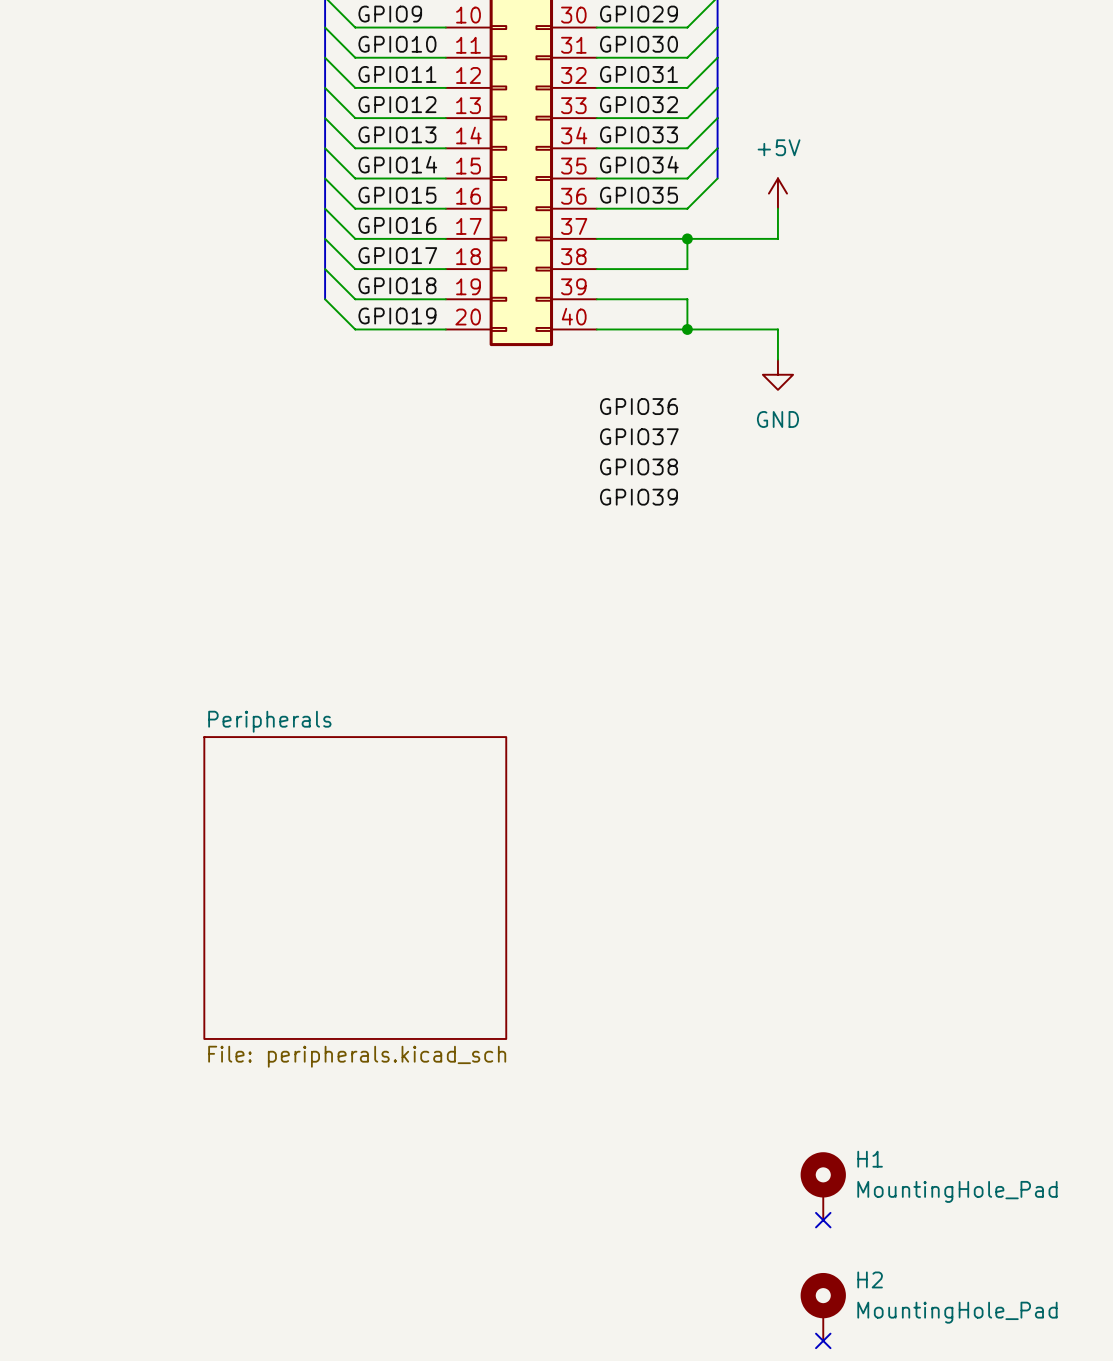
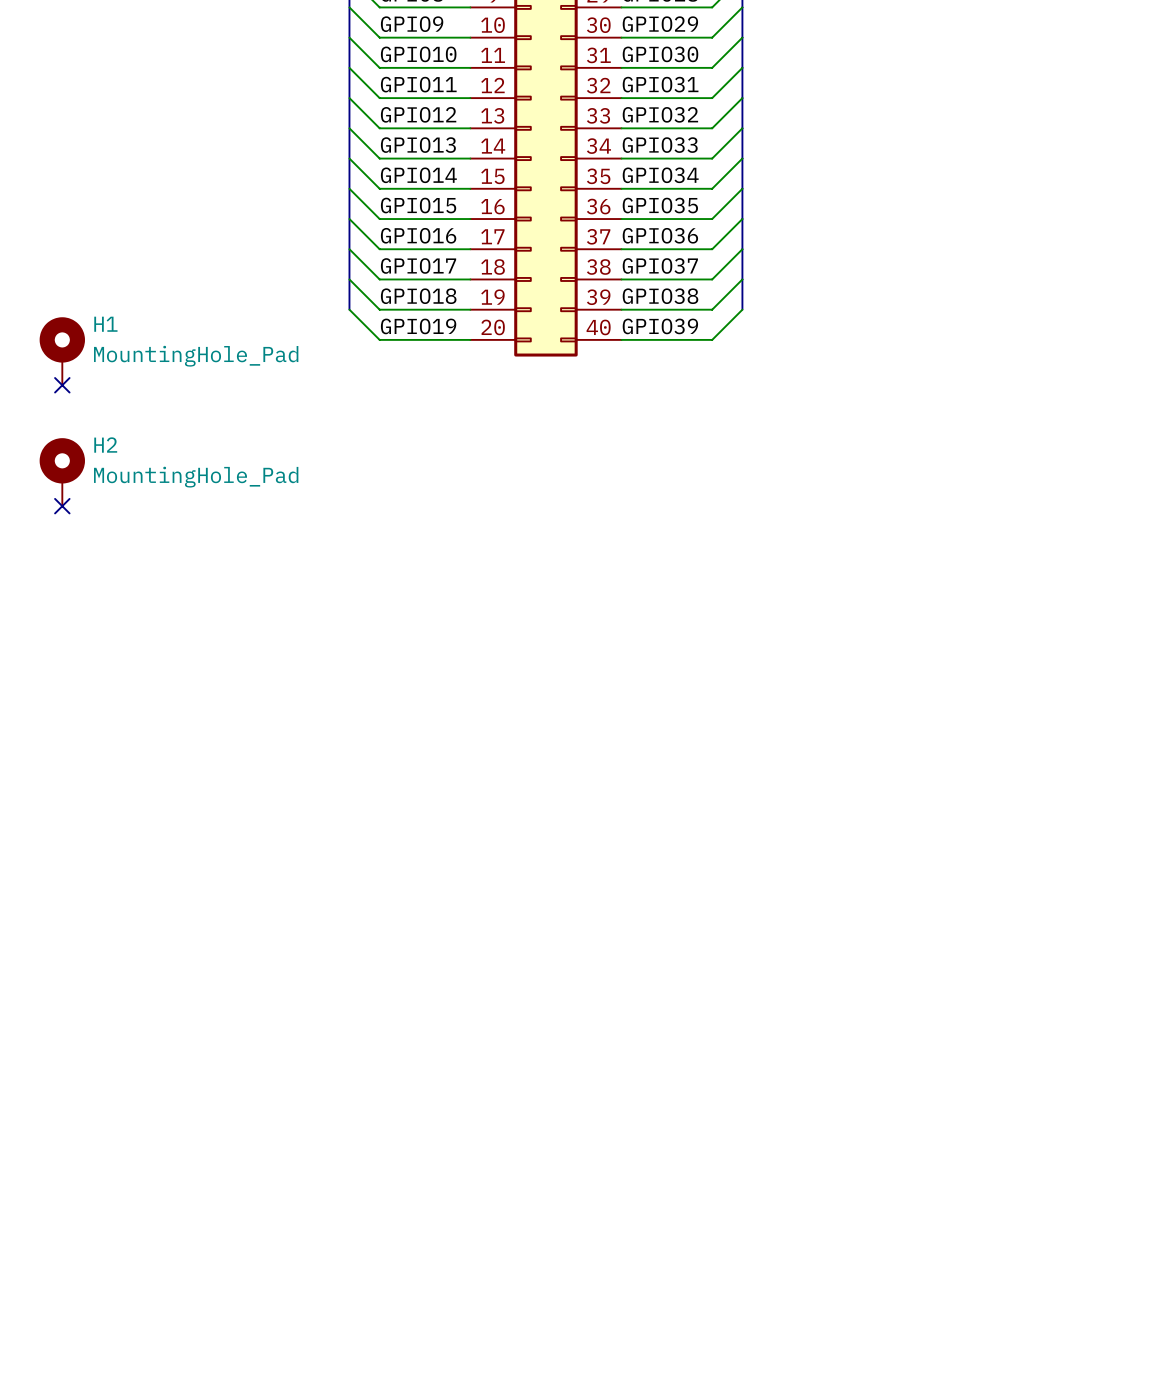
bus: none -> (742, 188) (742, 309)
power symbol: +5V (777, 193) -> none
wire: none -> (742, 219) (712, 249)
wire: (777, 208) (777, 238) (687, 238) (687, 269) -> (742, 249) (712, 279)
junction: (687, 238) -> none
wire: (687, 299) (687, 329) (777, 329) (777, 359) -> (712, 309) (742, 279)
wire: none -> (742, 309) (712, 339)
junction: (687, 329) -> none
no-connect mark: none -> (62, 385)
power symbol: GND (777, 374) -> none
label position: GPIO36 (638, 406) -> GPIO36 (660, 235)
label position: GPIO37 (639, 436) -> GPIO37 (660, 265)
label position: GPIO38 (638, 466) -> GPIO38 (660, 296)
no-connect mark: none -> (62, 506)
label position: GPIO39 (638, 497) -> GPIO39 (660, 326)
sheet Peripherals: File: peripherals.kicad_sch (355, 888) -> none
H1 position: (823, 1186) -> (62, 351)
no-connect mark: (823, 1220) -> none
H2 position: (823, 1306) -> (62, 472)
no-connect mark: (823, 1340) -> none

